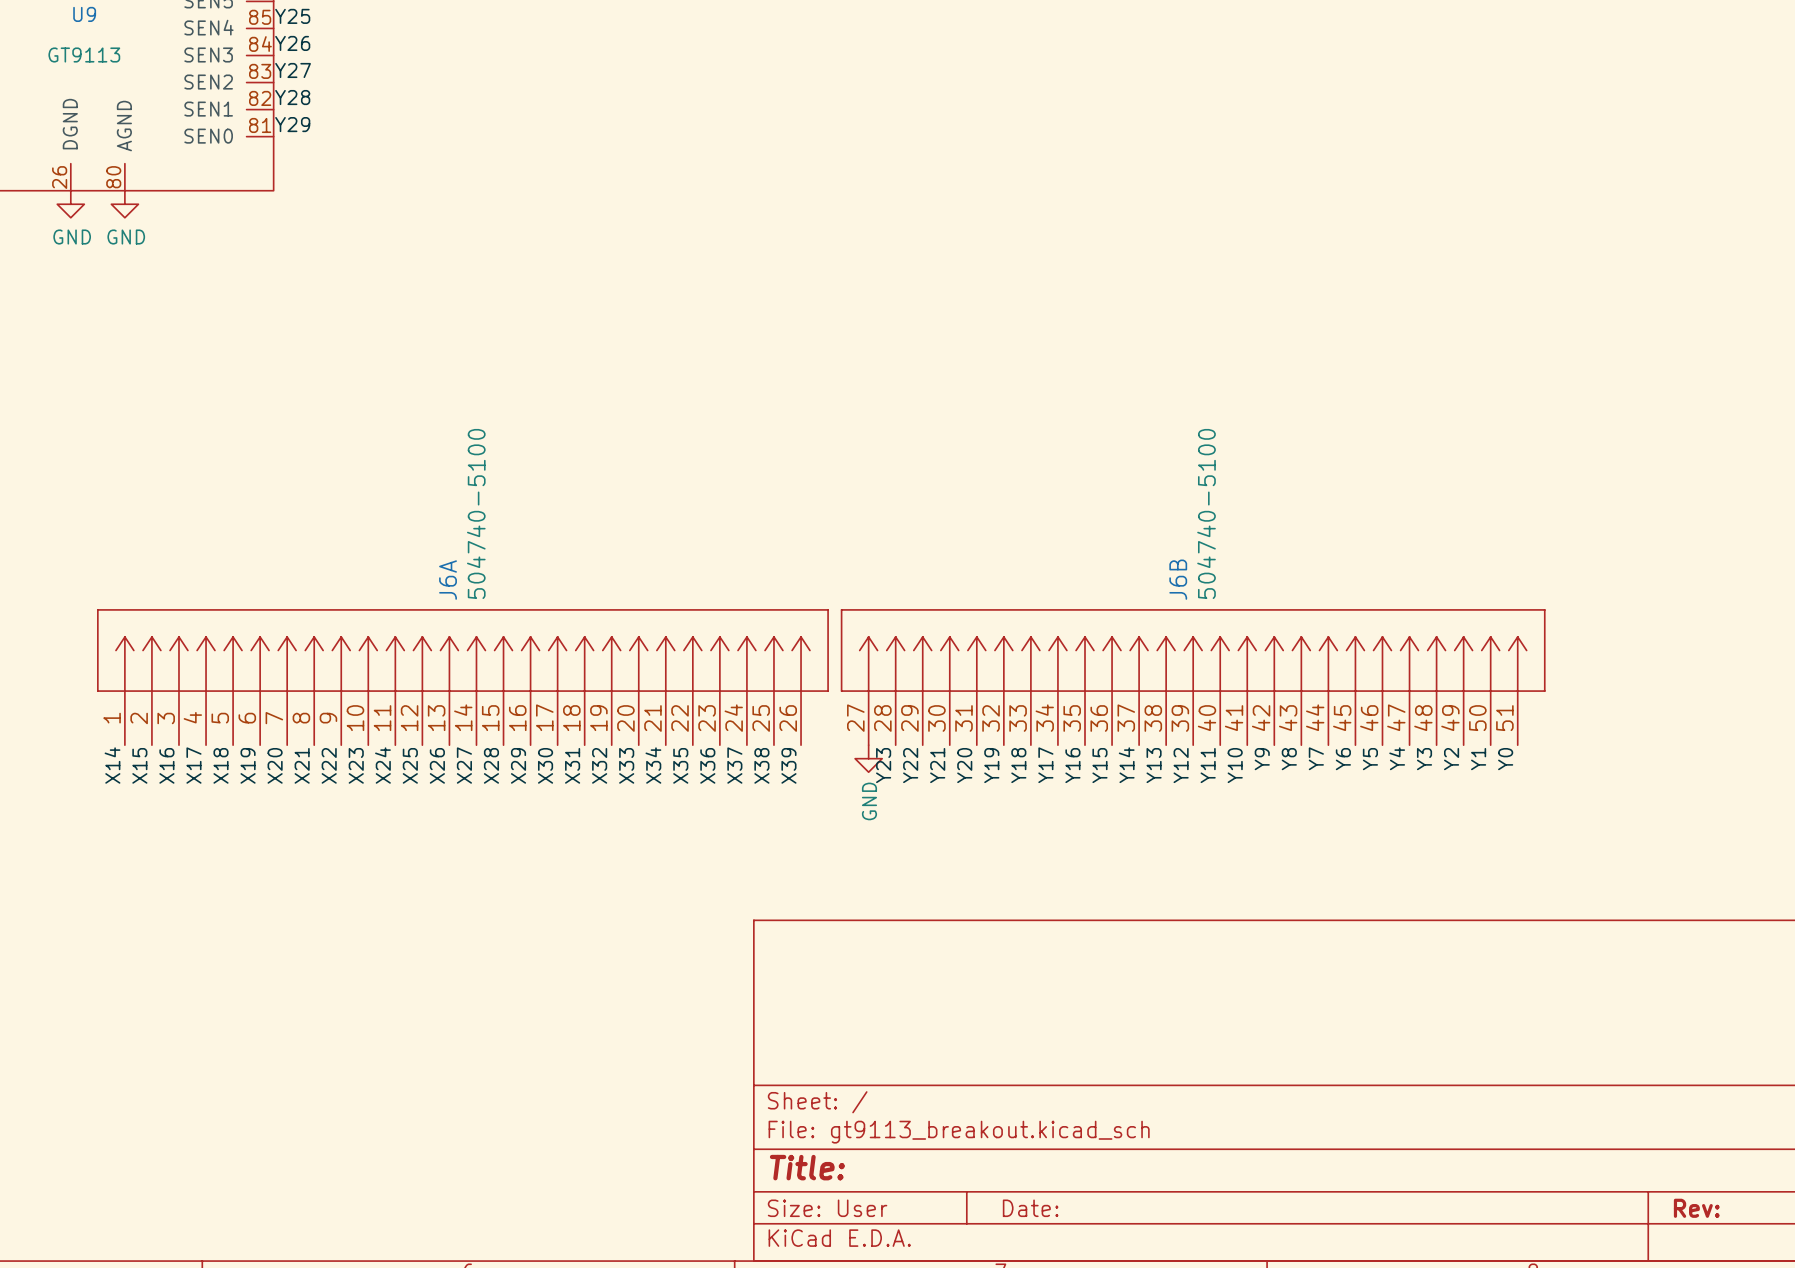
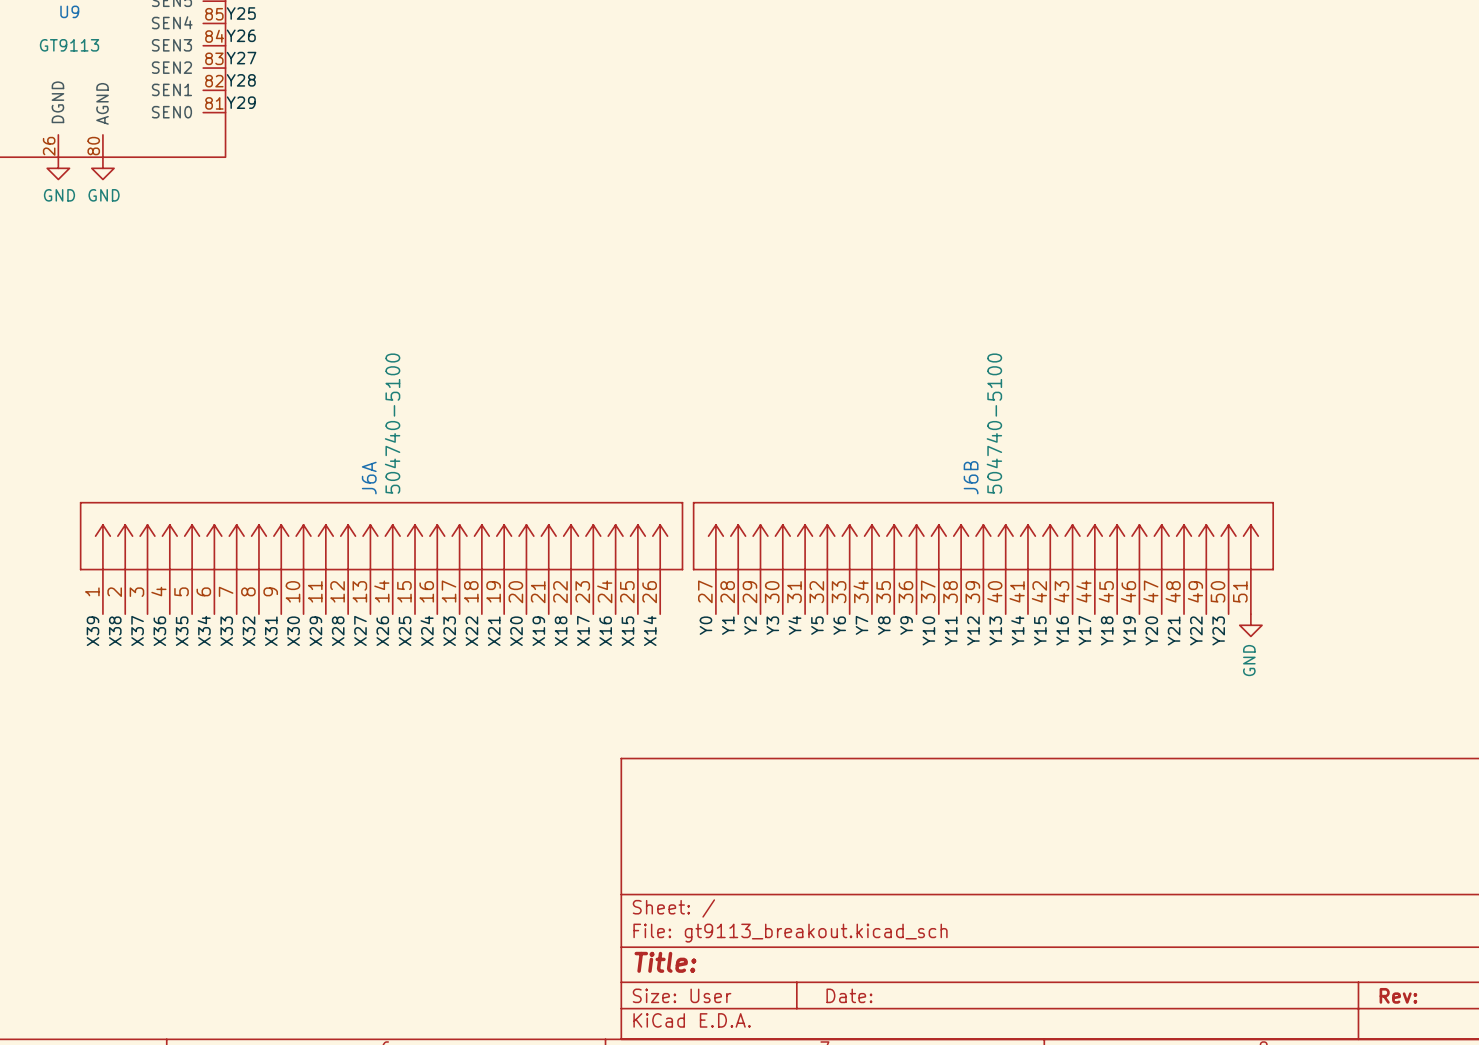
power symbol: GND (868, 758) -> none
label: Y7 (1316, 758) -> Y17 (1084, 630)
label: Y4 (1397, 758) -> Y20 (1151, 630)
power symbol: none -> GND (1250, 625)
label: none -> Y0 (705, 625)
label: Y9 (1262, 759) -> Y15 (1040, 630)
label: Y8 (1289, 759) -> Y16 (1062, 630)
label: Y6 (1343, 759) -> Y18 (1107, 630)
label: Y5 (1370, 759) -> Y19 (1129, 630)
label: Y3 (1424, 759) -> Y21 (1174, 630)
label: Y2 (1451, 759) -> Y22 (1196, 630)
label: Y1 (1478, 759) -> Y23 (1218, 630)
label: Y0 (1505, 759) -> none
label: X14 (112, 765) -> X39 (92, 631)
label: X15 (139, 765) -> X38 (115, 631)
label: X16 (166, 765) -> X37 (137, 630)
label: X17 (193, 765) -> X36 (159, 631)
label: X18 (221, 765) -> X35 (182, 631)
label: X19 (248, 765) -> X34 (204, 630)
label: X20 (275, 765) -> X33 (226, 631)
label: X21 (302, 765) -> X32 (249, 631)
label: X22 (329, 765) -> X31 (271, 631)
label: X23 (356, 765) -> X30 (293, 631)
label: X24 (382, 765) -> X29 (315, 631)
label: X25 (410, 765) -> X28 (338, 631)
label: X26 (437, 765) -> X27 (360, 630)
label: X27 (464, 765) -> X26 (382, 631)
label: X28 (491, 765) -> X25 (405, 631)
label: X29 (518, 765) -> X24 (427, 630)
label: X30 (545, 765) -> X23 (449, 631)
label: X31 (572, 765) -> X22 (471, 631)
label: X32 (599, 765) -> X21 (494, 631)
label: X33 (626, 765) -> X20 (516, 631)
label: X34 (653, 765) -> X19 (538, 631)
label: X35 (680, 765) -> X18 (561, 631)
label: X36 (707, 765) -> X17 (583, 630)
label: X37 (734, 765) -> X16 (605, 631)
label: X38 (761, 765) -> X15 (627, 631)
label: X39 (788, 765) -> X14 (649, 630)
label: Y23 (883, 765) -> Y1 (728, 625)
label: Y22 (910, 765) -> Y2 (750, 625)
label: Y21 (937, 765) -> Y3 (772, 625)
label: Y20 (964, 765) -> Y4 (794, 625)
label: Y19 (991, 765) -> Y5 (817, 625)
label: Y18 (1018, 765) -> Y6 (839, 625)
label: Y17 (1045, 765) -> Y7 (862, 625)
label: Y16 (1072, 765) -> Y8 (884, 625)
label: Y15 (1099, 765) -> Y9 (906, 625)
label: Y14 (1126, 765) -> Y10 (928, 630)
label: Y13 (1154, 765) -> Y11 (951, 630)
label: Y11 (1208, 765) -> Y13 (995, 630)
label: Y10 (1235, 765) -> Y14 (1017, 630)

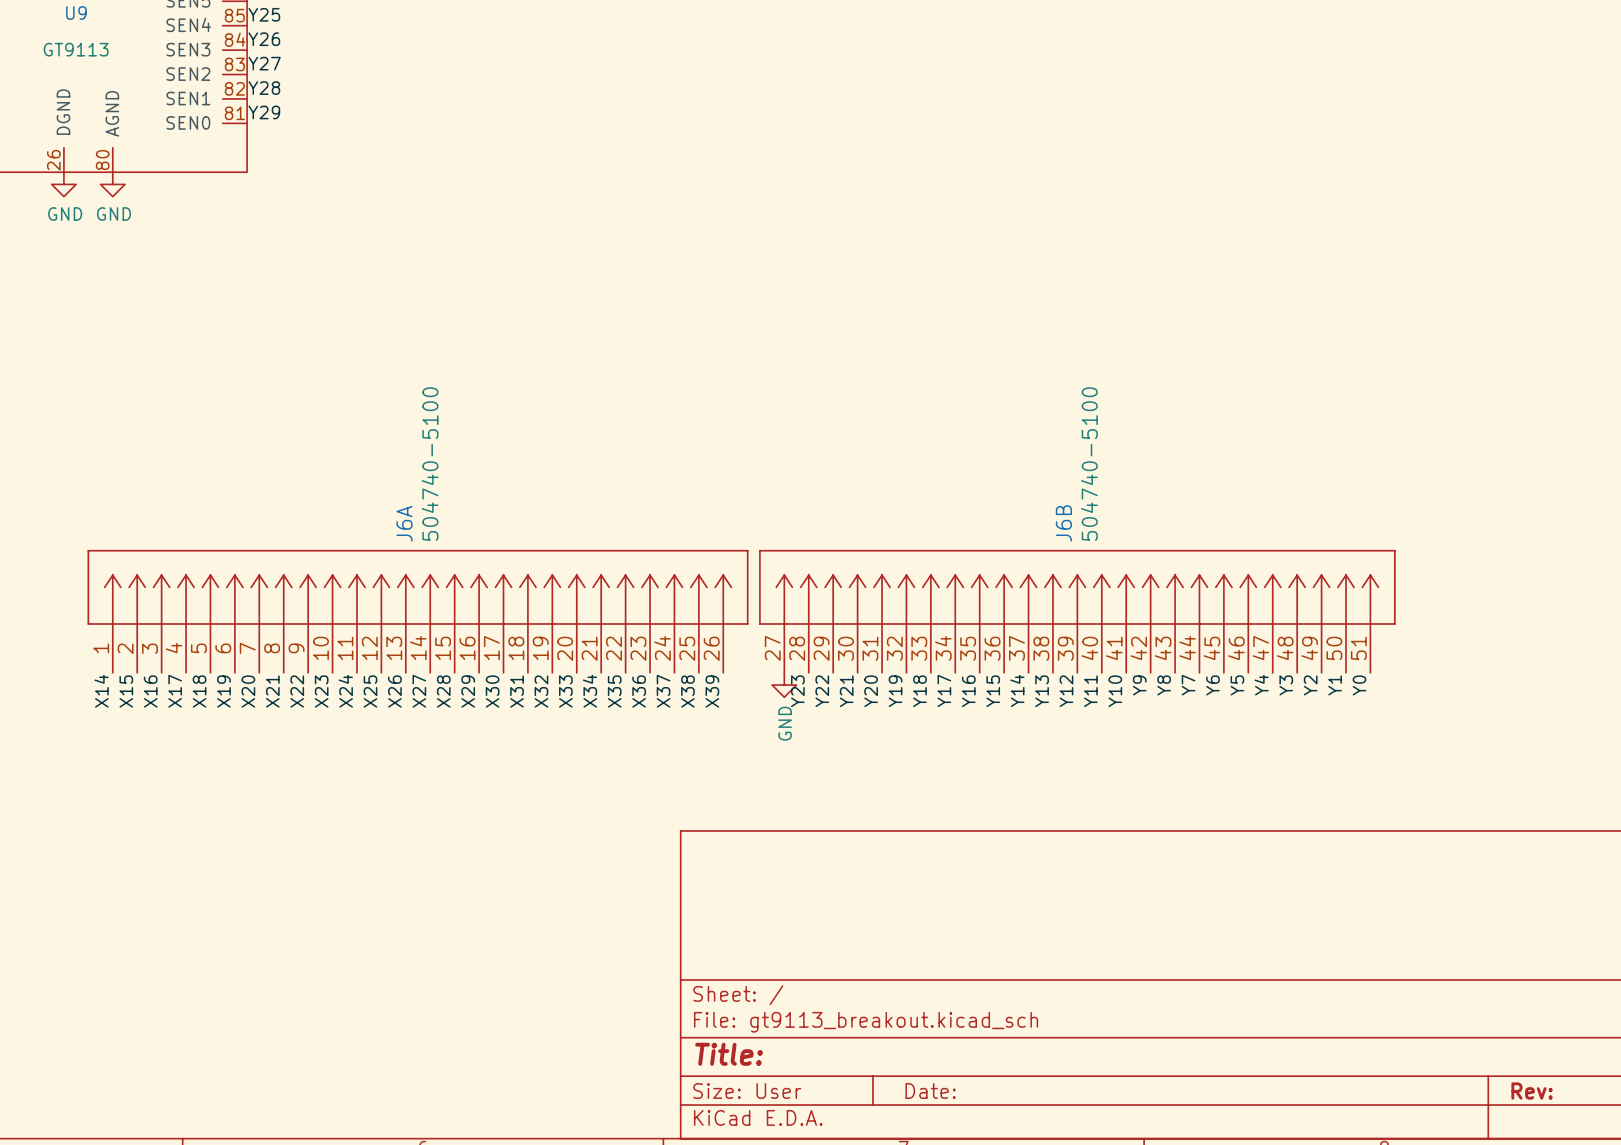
label: Y0 (705, 625) -> none
power symbol: none -> GND (784, 685)
label: Y1 (728, 625) -> Y23 (797, 691)
label: Y2 (750, 625) -> Y22 (822, 691)
label: Y3 (772, 625) -> Y21 (846, 691)
label: Y4 (794, 625) -> Y20 (871, 691)
label: Y5 (817, 625) -> Y19 (895, 691)
label: Y6 (839, 625) -> Y18 (919, 691)
label: Y7 (862, 625) -> Y17 (944, 690)
label: Y8 (884, 625) -> Y16 (968, 691)
label: Y9 (906, 625) -> Y15 (993, 691)
label: none -> Y0 (1359, 685)
power symbol: GND (1250, 625) -> none
label: X37 (137, 630) -> X16 (150, 691)
label: X34 (204, 630) -> X19 (223, 691)
label: X27 (360, 630) -> X26 (394, 691)
label: X24 (427, 630) -> X29 (468, 691)
label: X17 (583, 630) -> X36 (639, 691)
label: X14 (649, 630) -> X39 (712, 691)
label: Y10 (928, 630) -> Y14 (1017, 690)
label: Y11 (951, 630) -> Y13 (1042, 691)
label: Y13 (995, 630) -> Y11 (1090, 691)
label: Y14 (1017, 630) -> Y10 (1115, 691)
label: Y15 (1040, 630) -> Y9 (1139, 685)
label: Y16 (1062, 630) -> Y8 (1164, 685)
label: Y17 (1084, 630) -> Y7 (1188, 685)
label: Y18 (1107, 630) -> Y6 (1213, 685)
label: Y19 (1129, 630) -> Y5 (1237, 685)
label: Y20 (1151, 630) -> Y4 (1261, 685)
label: Y21 (1174, 630) -> Y3 (1286, 685)
label: Y22 (1196, 630) -> Y2 (1310, 685)
label: Y23 (1218, 630) -> Y1 (1335, 685)
label: X39 (92, 631) -> X14 (101, 691)
label: X38 (115, 631) -> X15 (126, 691)
label: X36 (159, 631) -> X17 (175, 691)
label: X35 (182, 631) -> X18 (199, 691)
label: X33 (226, 631) -> X20 (248, 691)
label: X32 (249, 631) -> X21 (272, 691)
label: X31 (271, 631) -> X22 (297, 691)
label: X30 (293, 631) -> X23 (321, 691)
label: X29 (315, 631) -> X24 (345, 691)
label: X28 (338, 631) -> X25 (370, 691)
label: X26 (382, 631) -> X27 (419, 691)
label: X25 (405, 631) -> X28 (443, 691)
label: X23 (449, 631) -> X30 (492, 691)
label: X22 (471, 631) -> X31 (517, 691)
label: X21 (494, 631) -> X32 (541, 691)
label: X20 (516, 631) -> X33 (565, 691)
label: X19 (538, 631) -> X34 (589, 691)
label: X18 (561, 631) -> X35 (614, 691)
label: X16 (605, 631) -> X37 (663, 691)
label: X15 (627, 631) -> X38 (687, 691)

